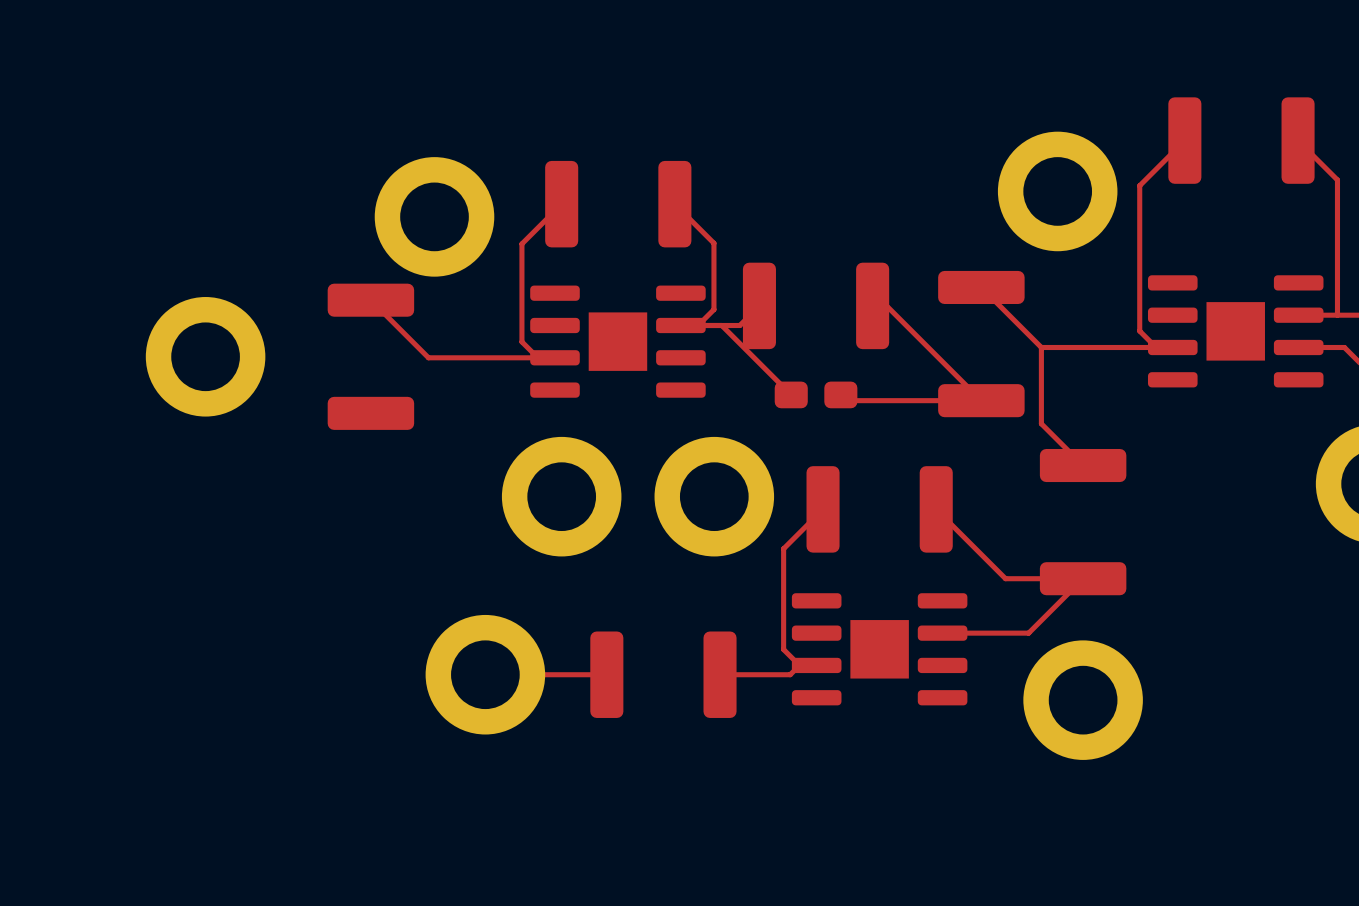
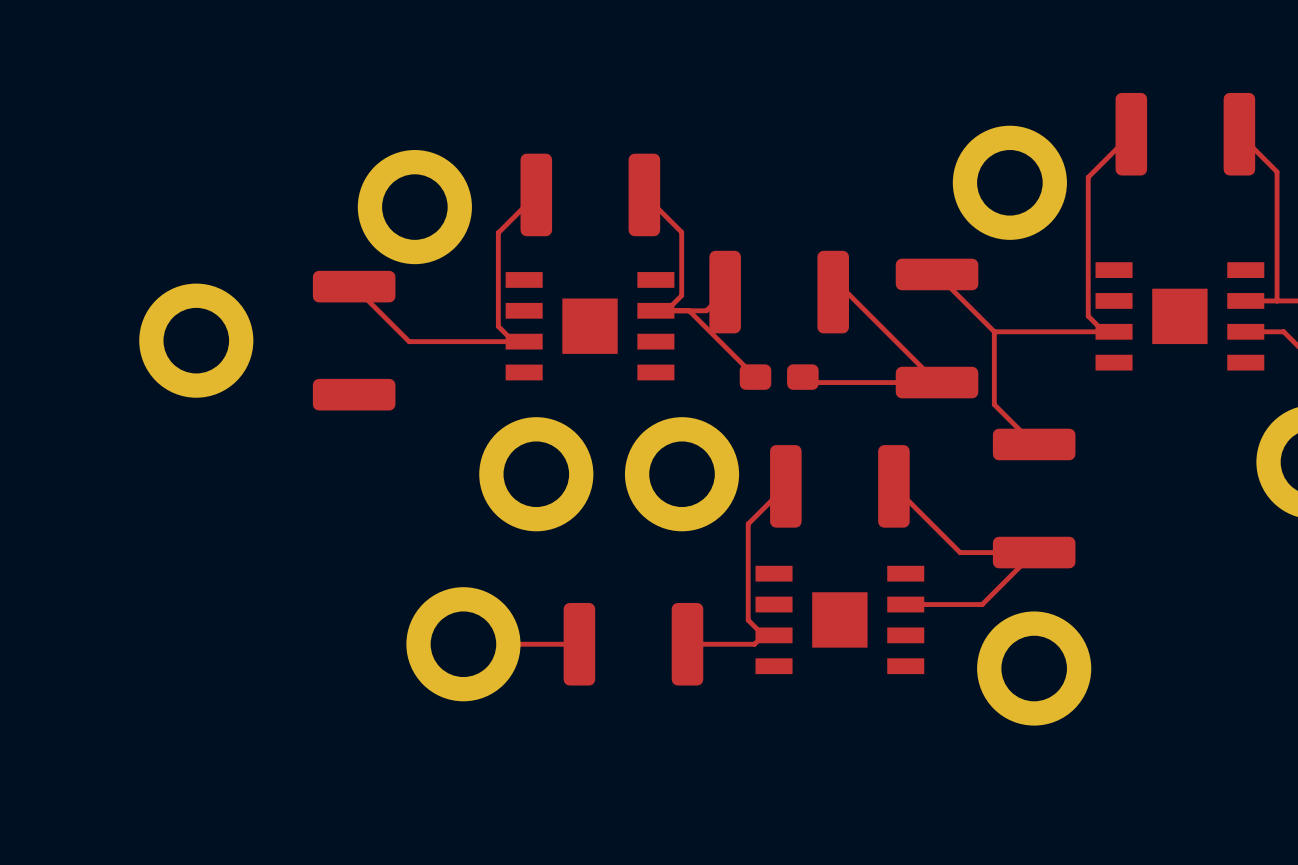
part footprint: [1147, 275, 1324, 388] -> [1095, 262, 1265, 371]
part footprint: [530, 285, 706, 398] -> [505, 272, 675, 381]
part footprint: [791, 593, 968, 706] -> [755, 565, 925, 675]

